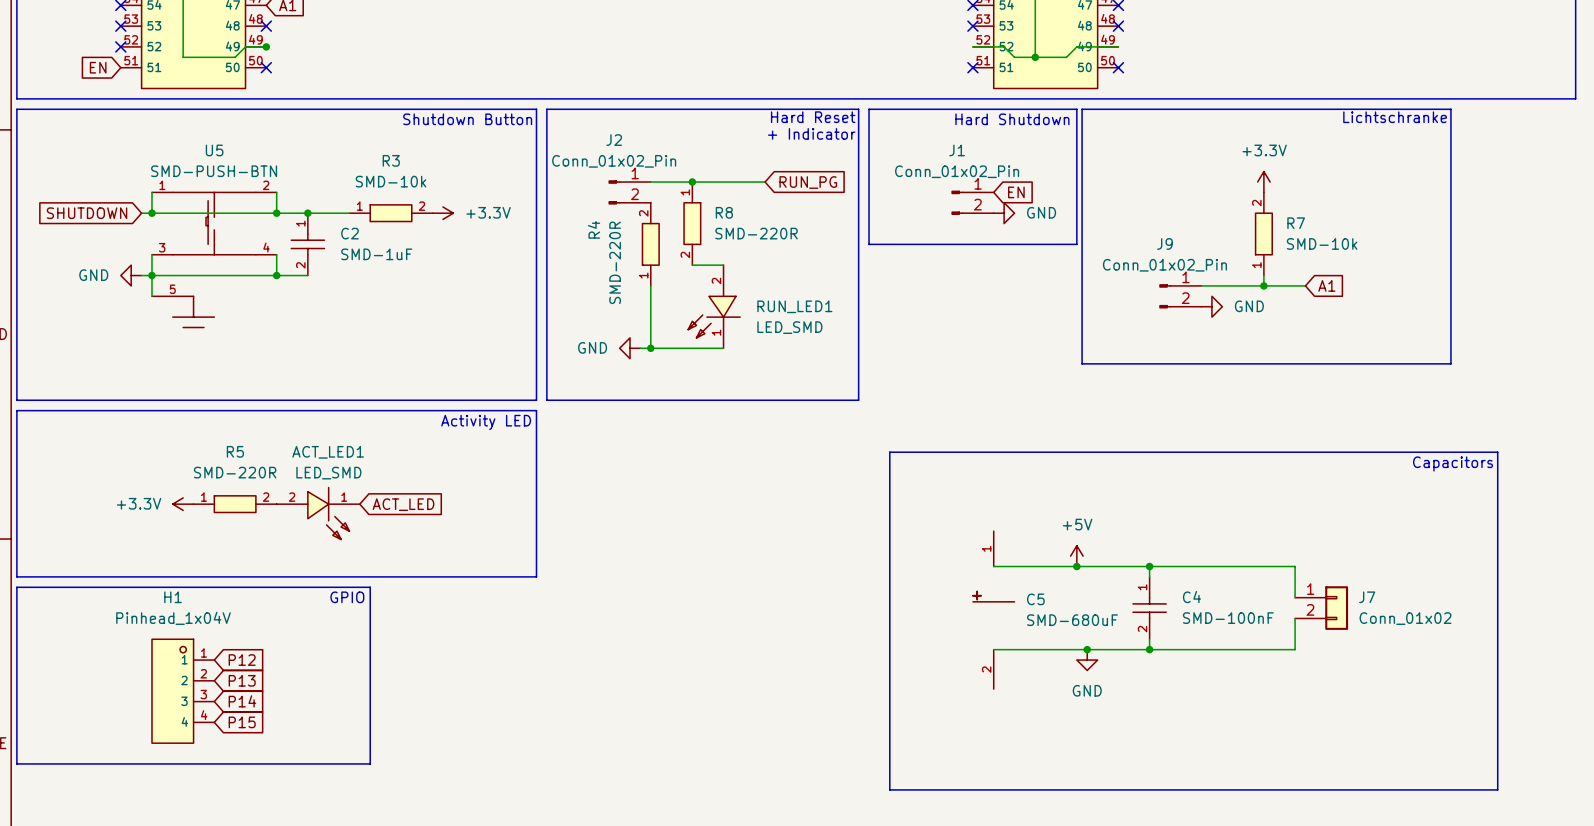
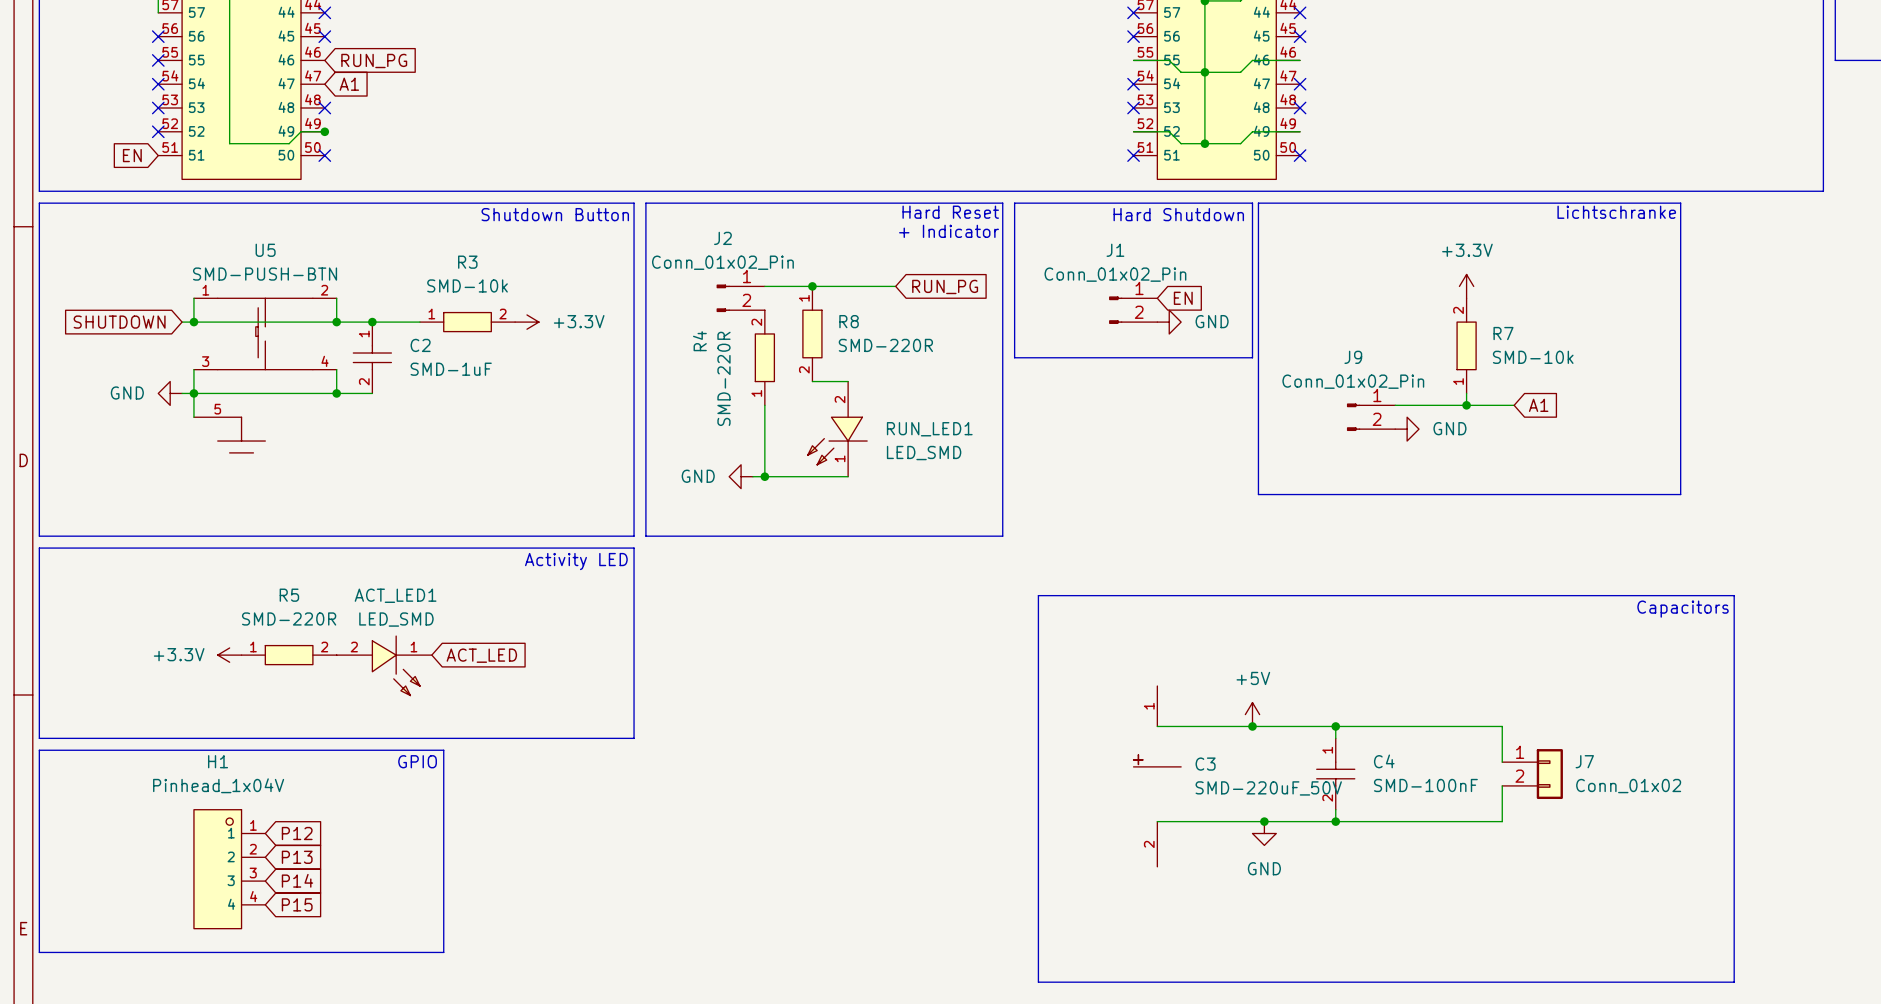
C5 name: C5 (1035, 599) -> C3 (1205, 764)
C5 value: SMD-680uF (1072, 620) -> SMD-220uF_50V (1268, 788)

